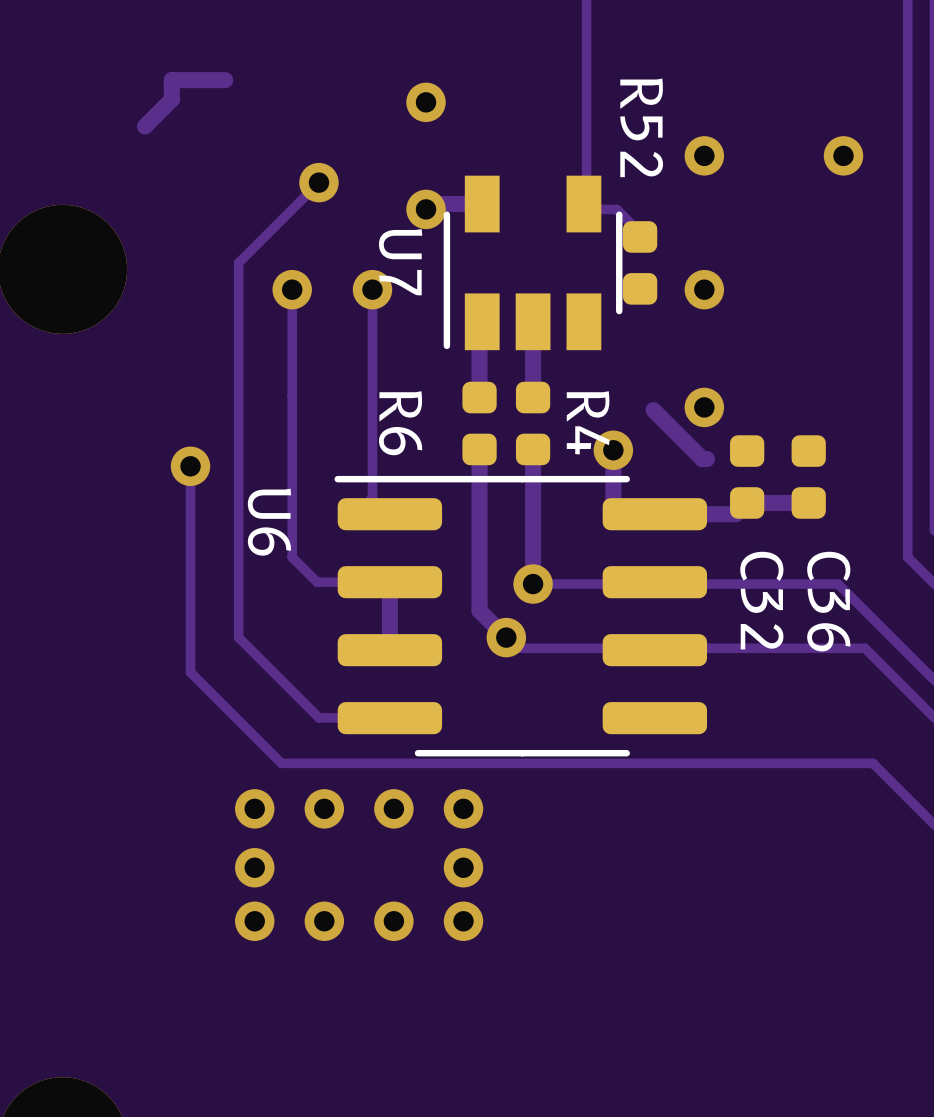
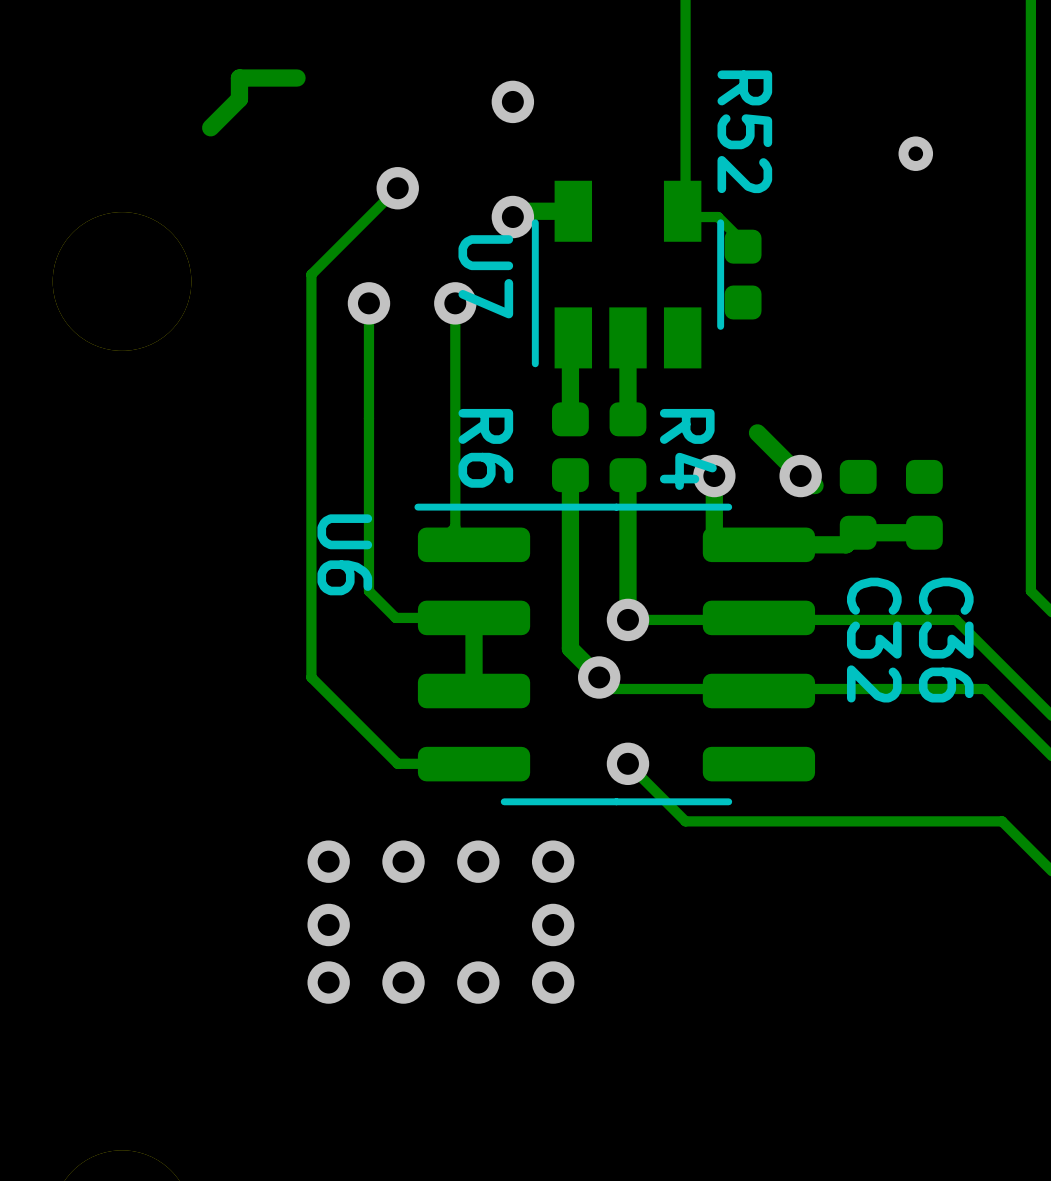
via: none -> (915, 153)
via: (704, 155) -> none
via: (843, 155) -> none
via: (704, 289) -> none
via position: (704, 407) -> (800, 476)
track: (190, 466) (190, 672) (281, 763) (872, 763) (880, 771) -> (627, 763) (685, 821) (1002, 821)
via: (190, 466) -> none
via: none -> (627, 763)

